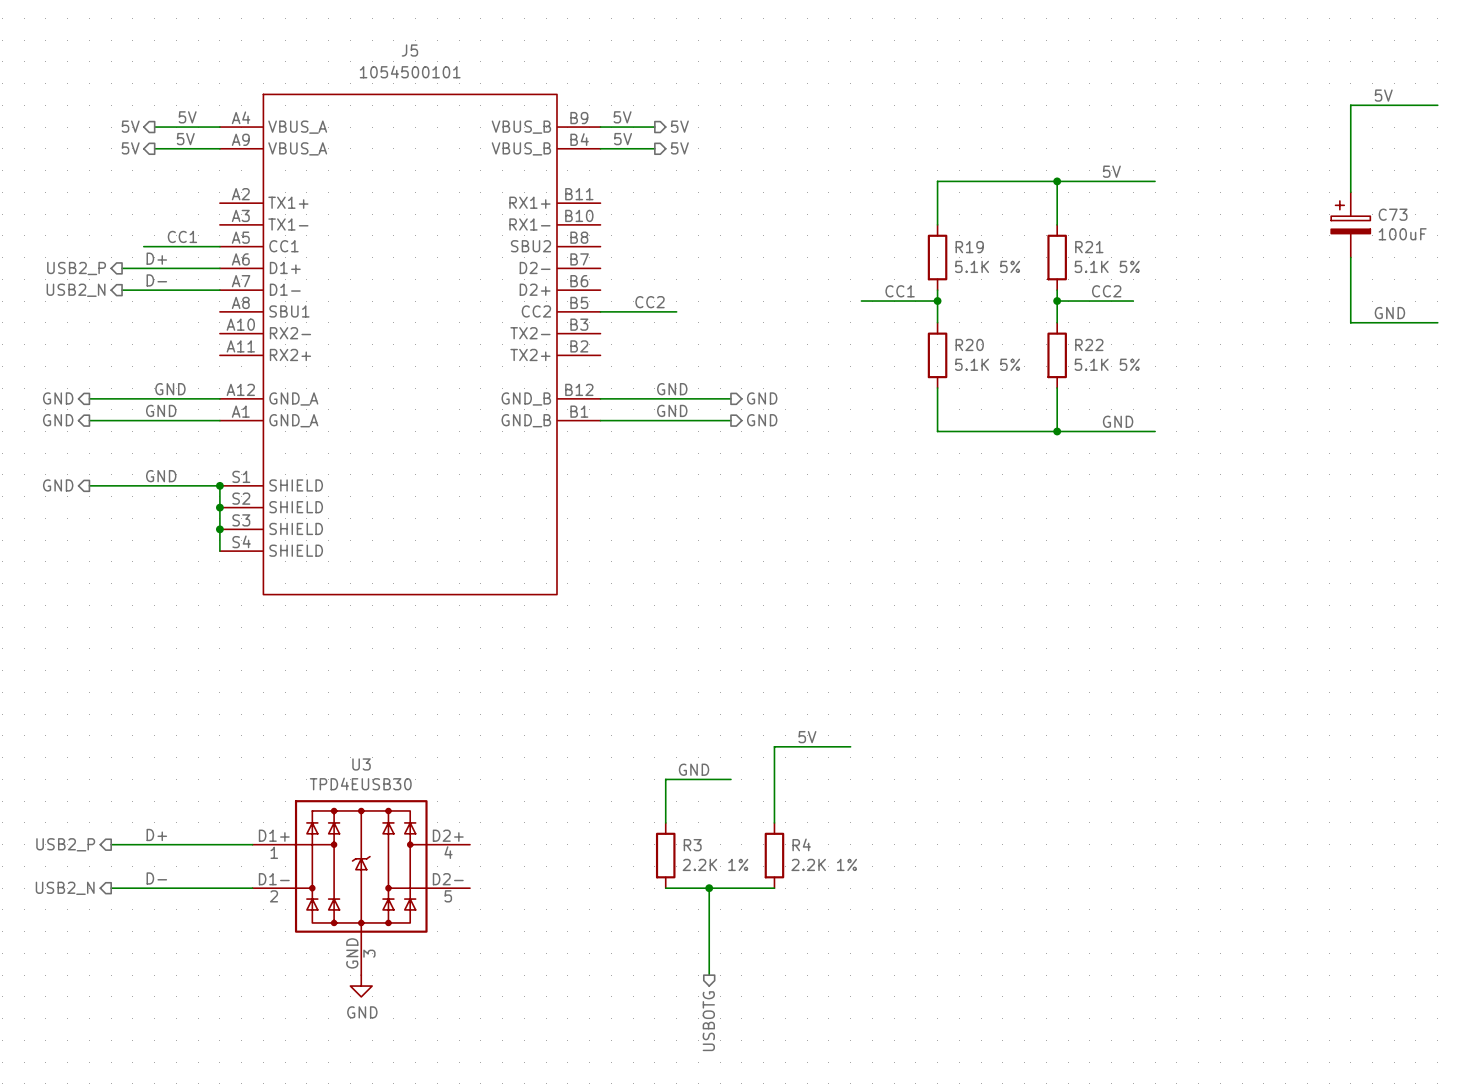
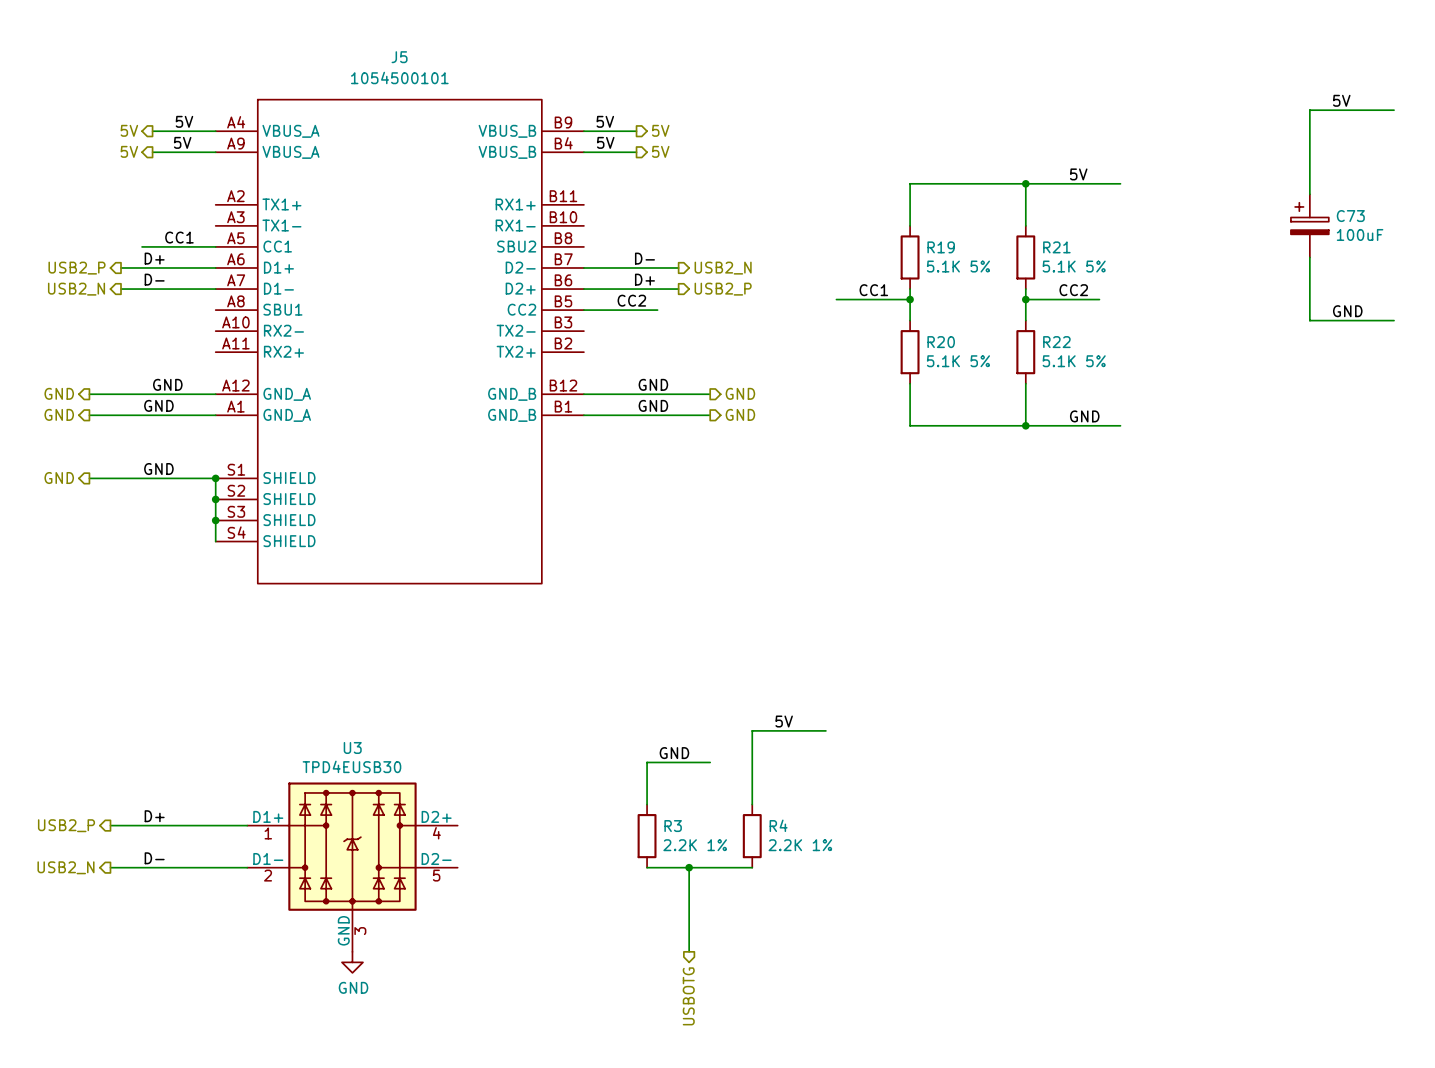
label: none -> D- (644, 258)
wire: none -> (583, 267) (678, 267)
hierarchical label: none -> USB2_N (723, 268)
label: none -> D+ (644, 279)
wire: none -> (583, 289) (678, 289)
hierarchical label: none -> USB2_P (723, 289)

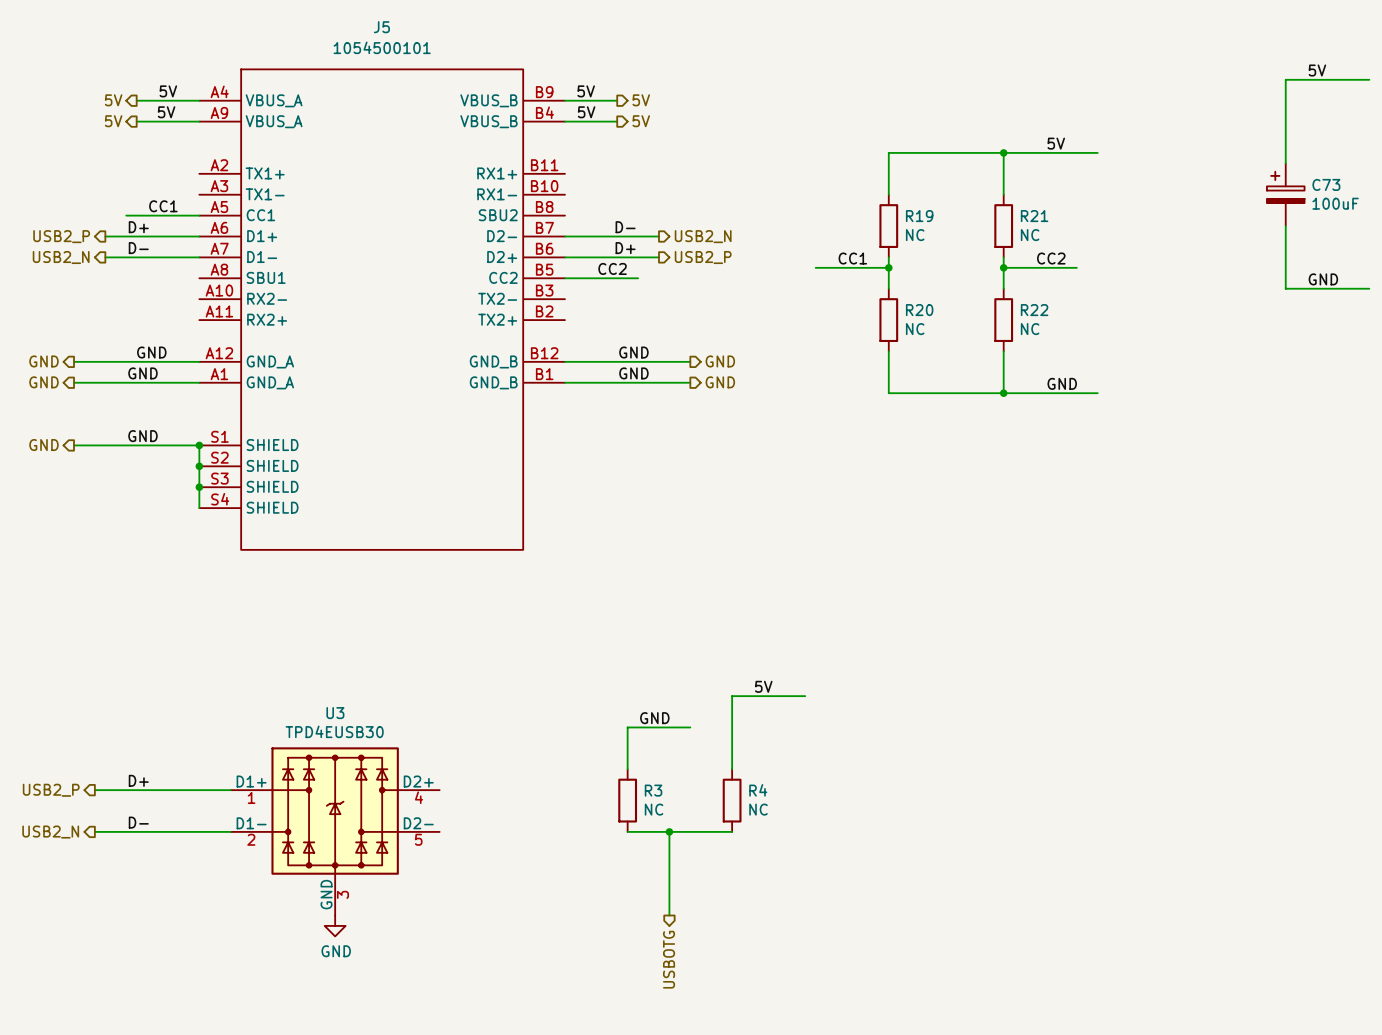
R19 value: 5.1K 5% (958, 266) -> NC (915, 235)
R21 value: 5.1K 5% (1074, 266) -> NC (1030, 235)
R20 value: 5.1K 5% (958, 361) -> NC (915, 329)
R22 value: 5.1K 5% (1074, 361) -> NC (1030, 329)
R3 value: 2.2K 1% (695, 845) -> NC (654, 809)
R4 value: 2.2K 1% (800, 845) -> NC (758, 809)

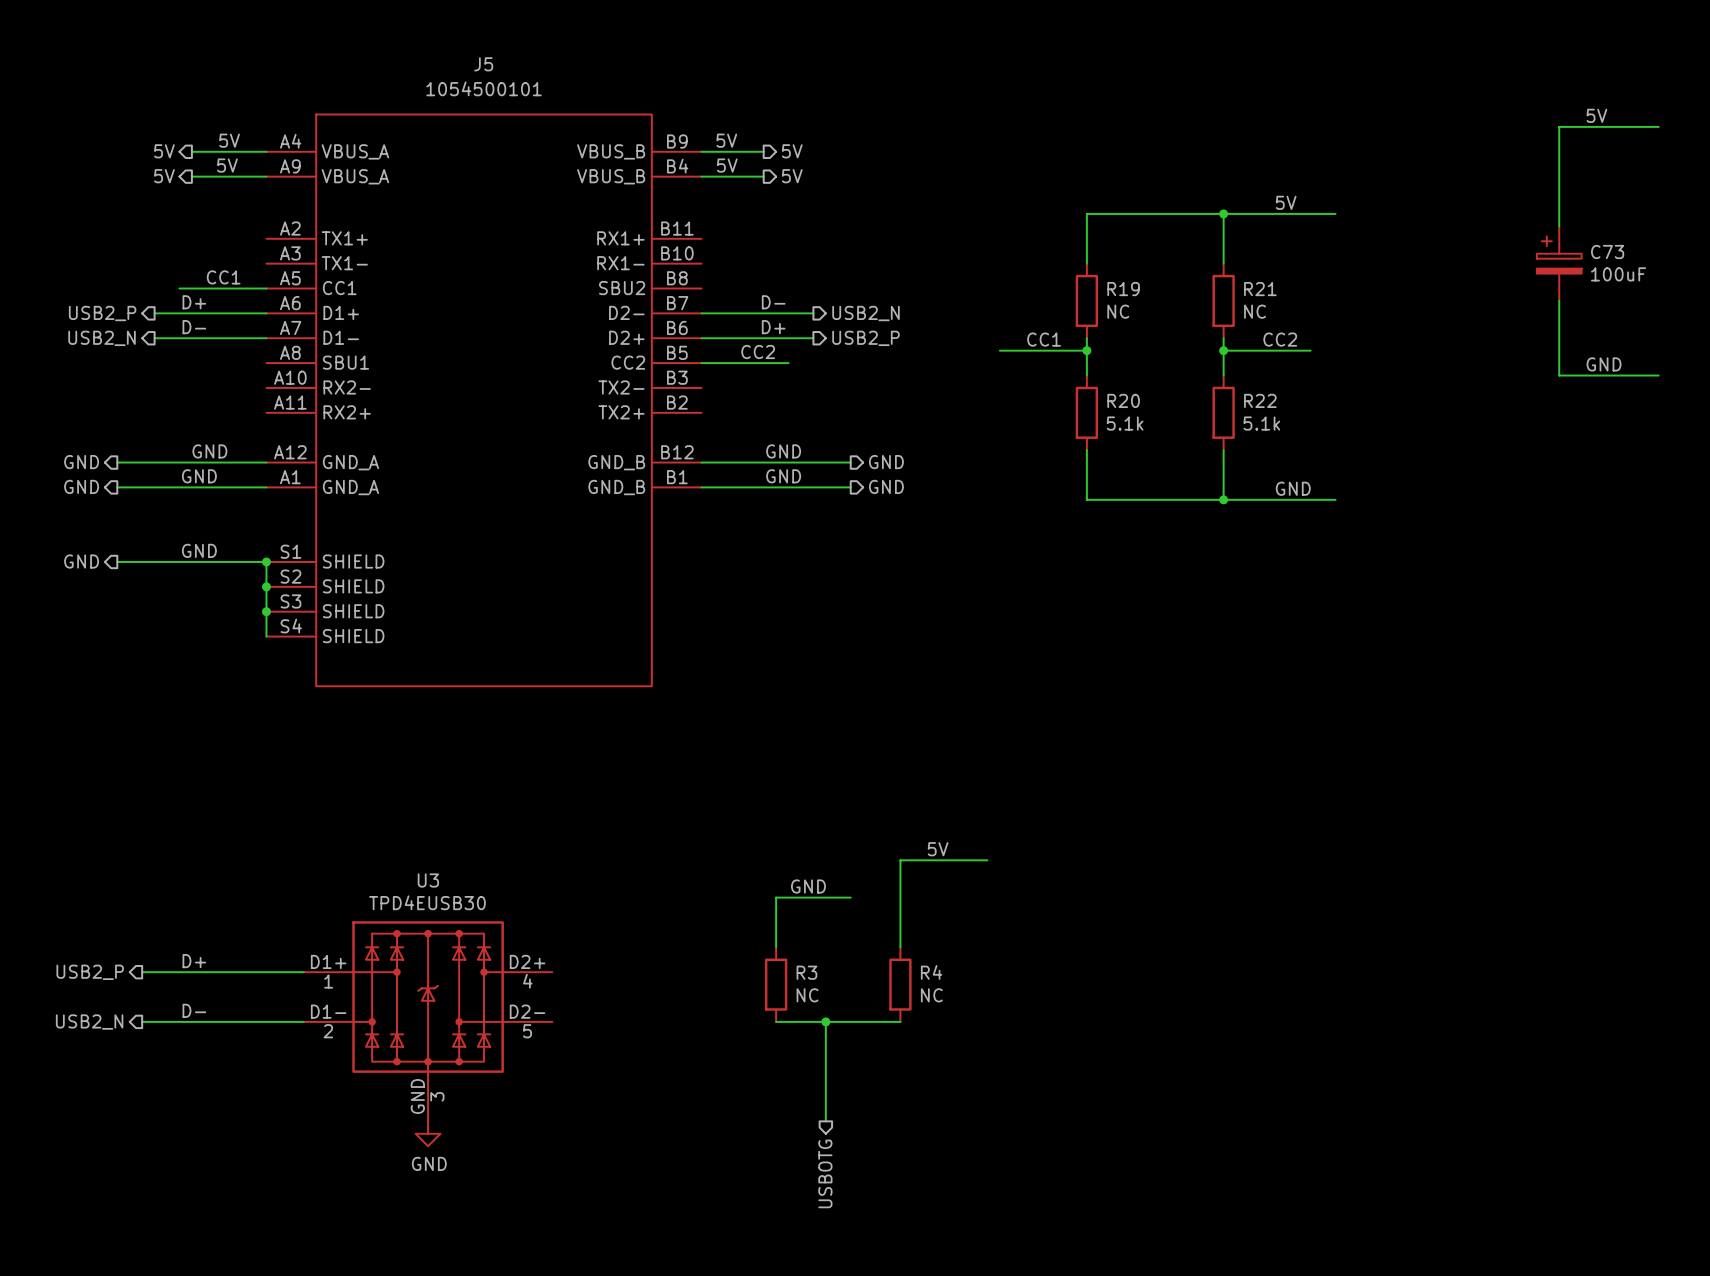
R20 value: NC (915, 329) -> 5.1k (1125, 423)
R22 value: NC (1030, 329) -> 5.1k (1261, 423)

